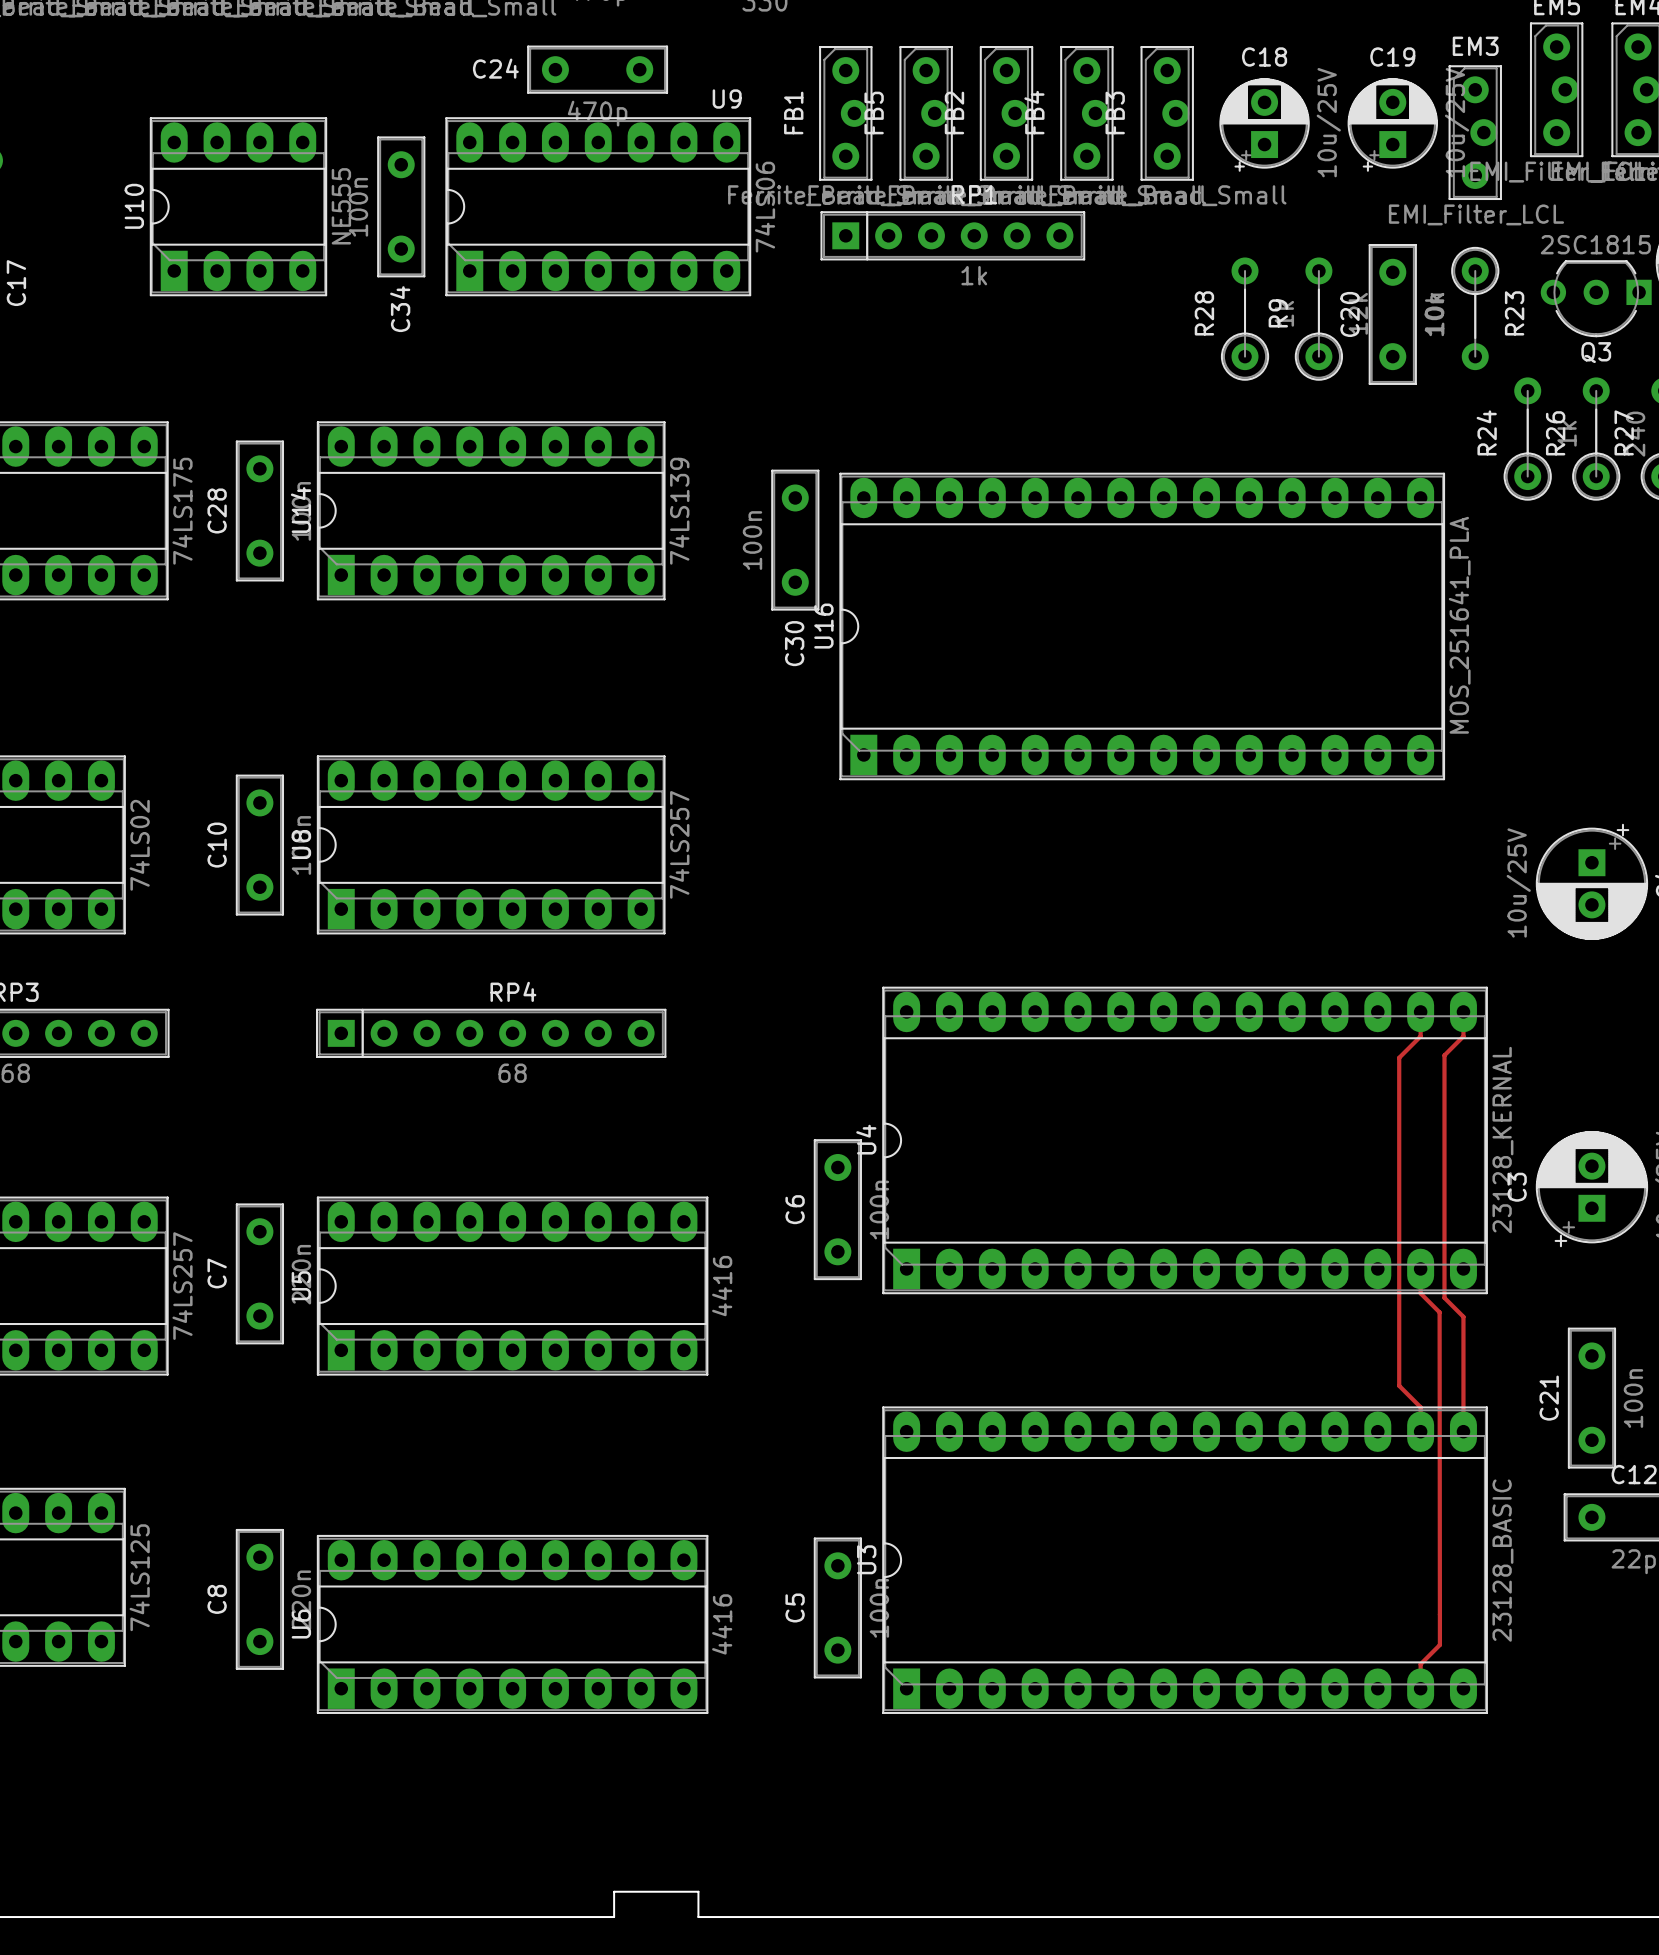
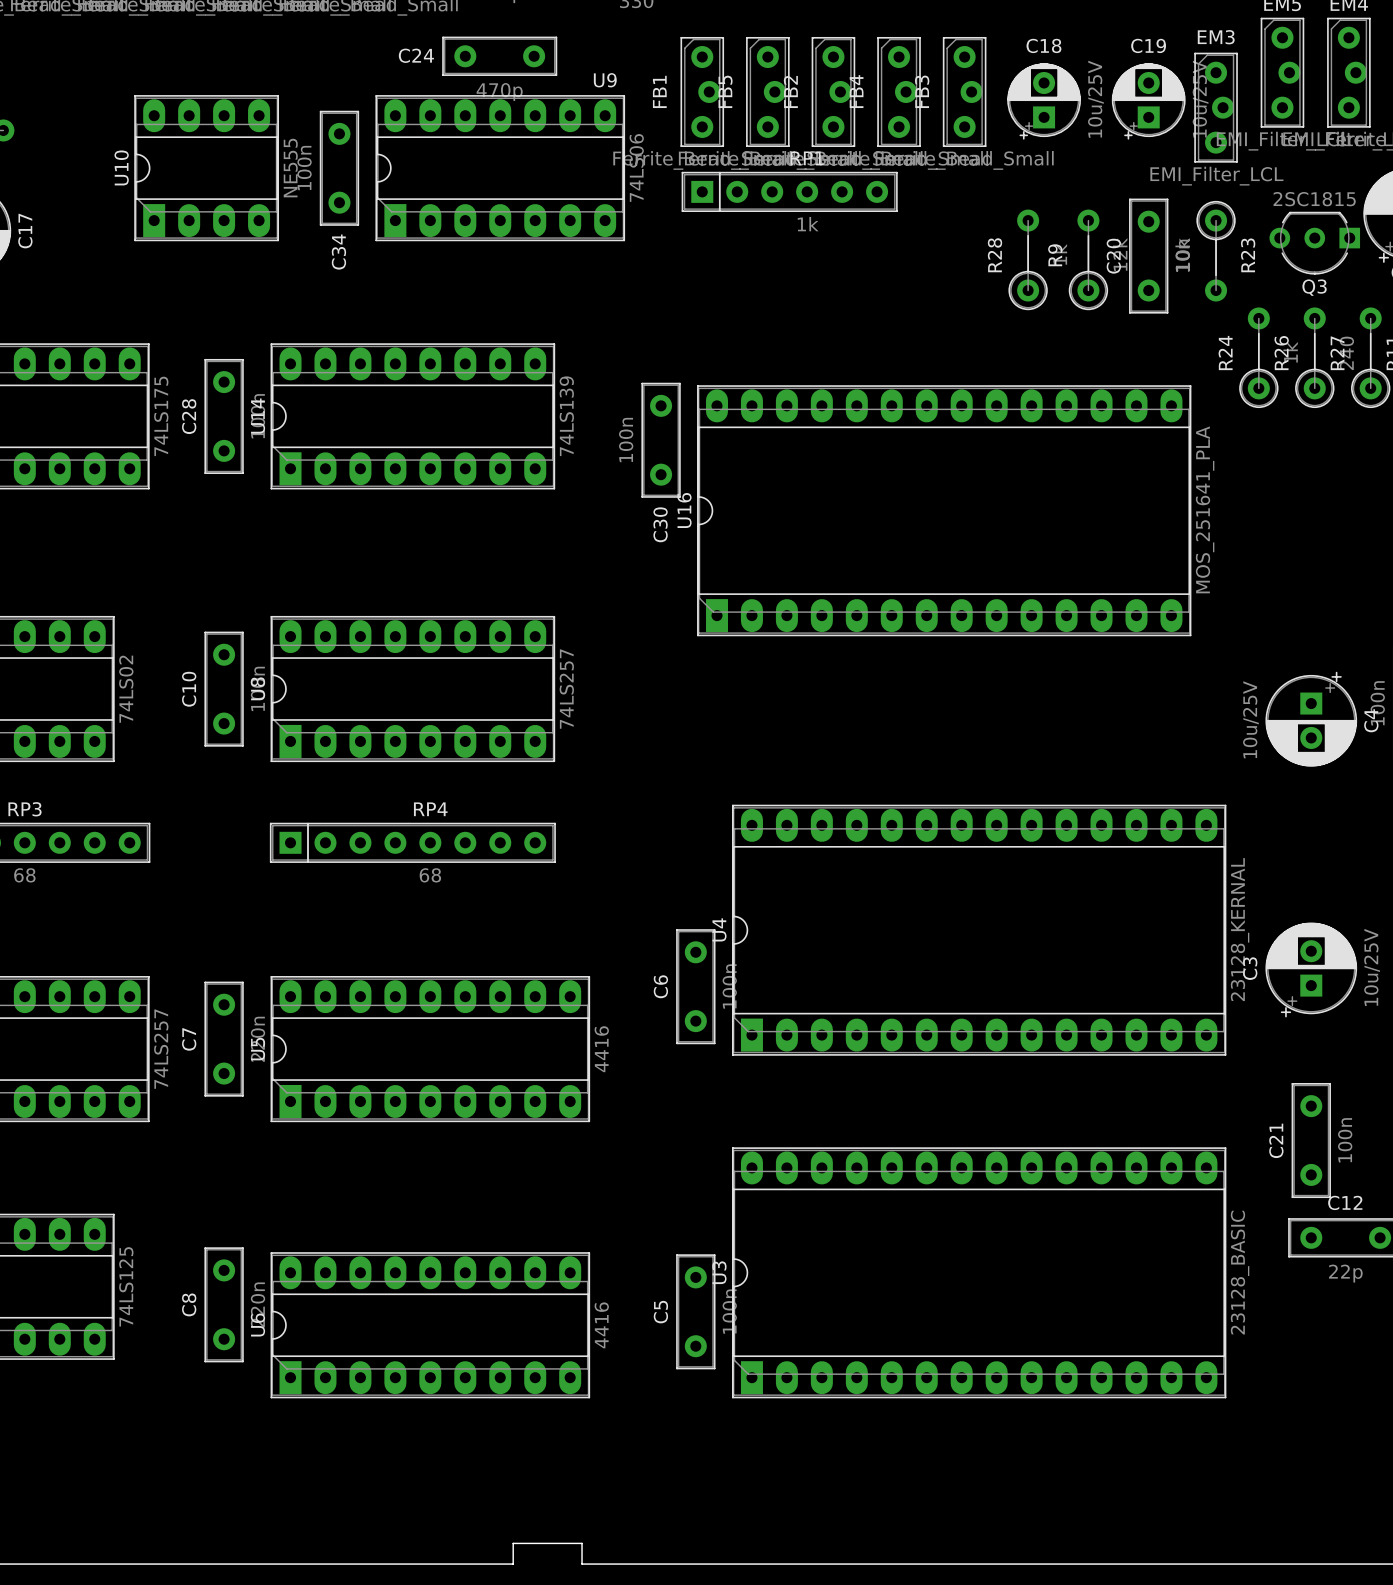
track: (1420, 1011) (1420, 1036) (1399, 1057) (1399, 1385) (1420, 1407) (1420, 1431) -> none
track: (1463, 1011) (1463, 1036) (1444, 1055) (1444, 1297) (1463, 1316) (1463, 1431) -> none
track: (1420, 1268) (1420, 1293) (1439, 1312) (1439, 1614) (1439, 1644) (1420, 1664) (1420, 1688) -> none

